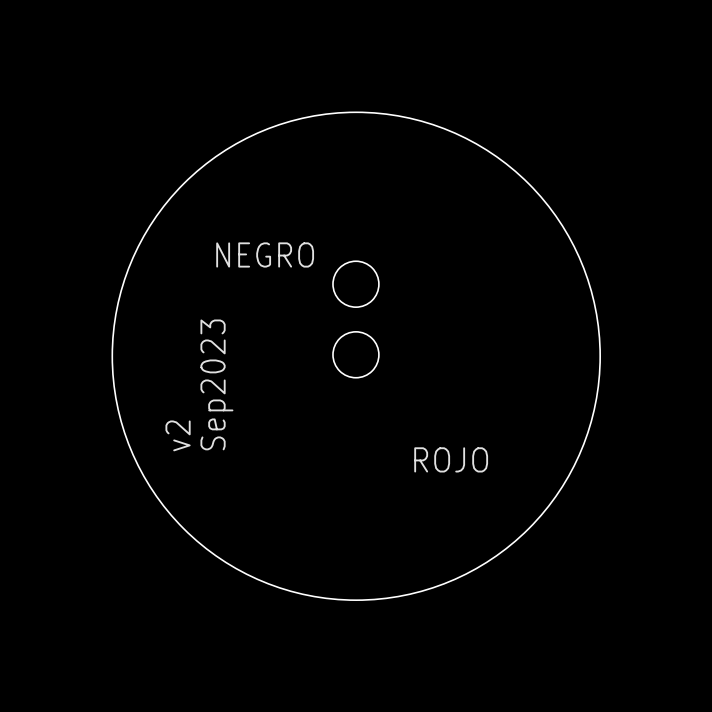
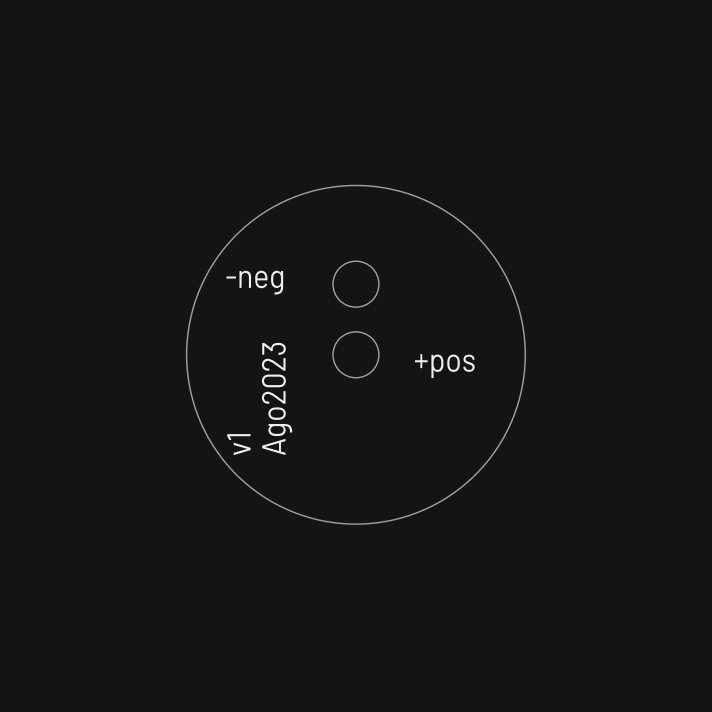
round board edge size: [112, 112, 601, 601] -> [186, 185, 526, 525]
text: NEGRO (265, 254) -> -neg (254, 282)
text: none -> +pos (444, 366)
text: Sep2023 (216, 384) -> v1 (238, 444)
text: none -> Ago2023 (277, 398)
text: v2 (178, 435) -> none
text: ROJO (451, 459) -> none

